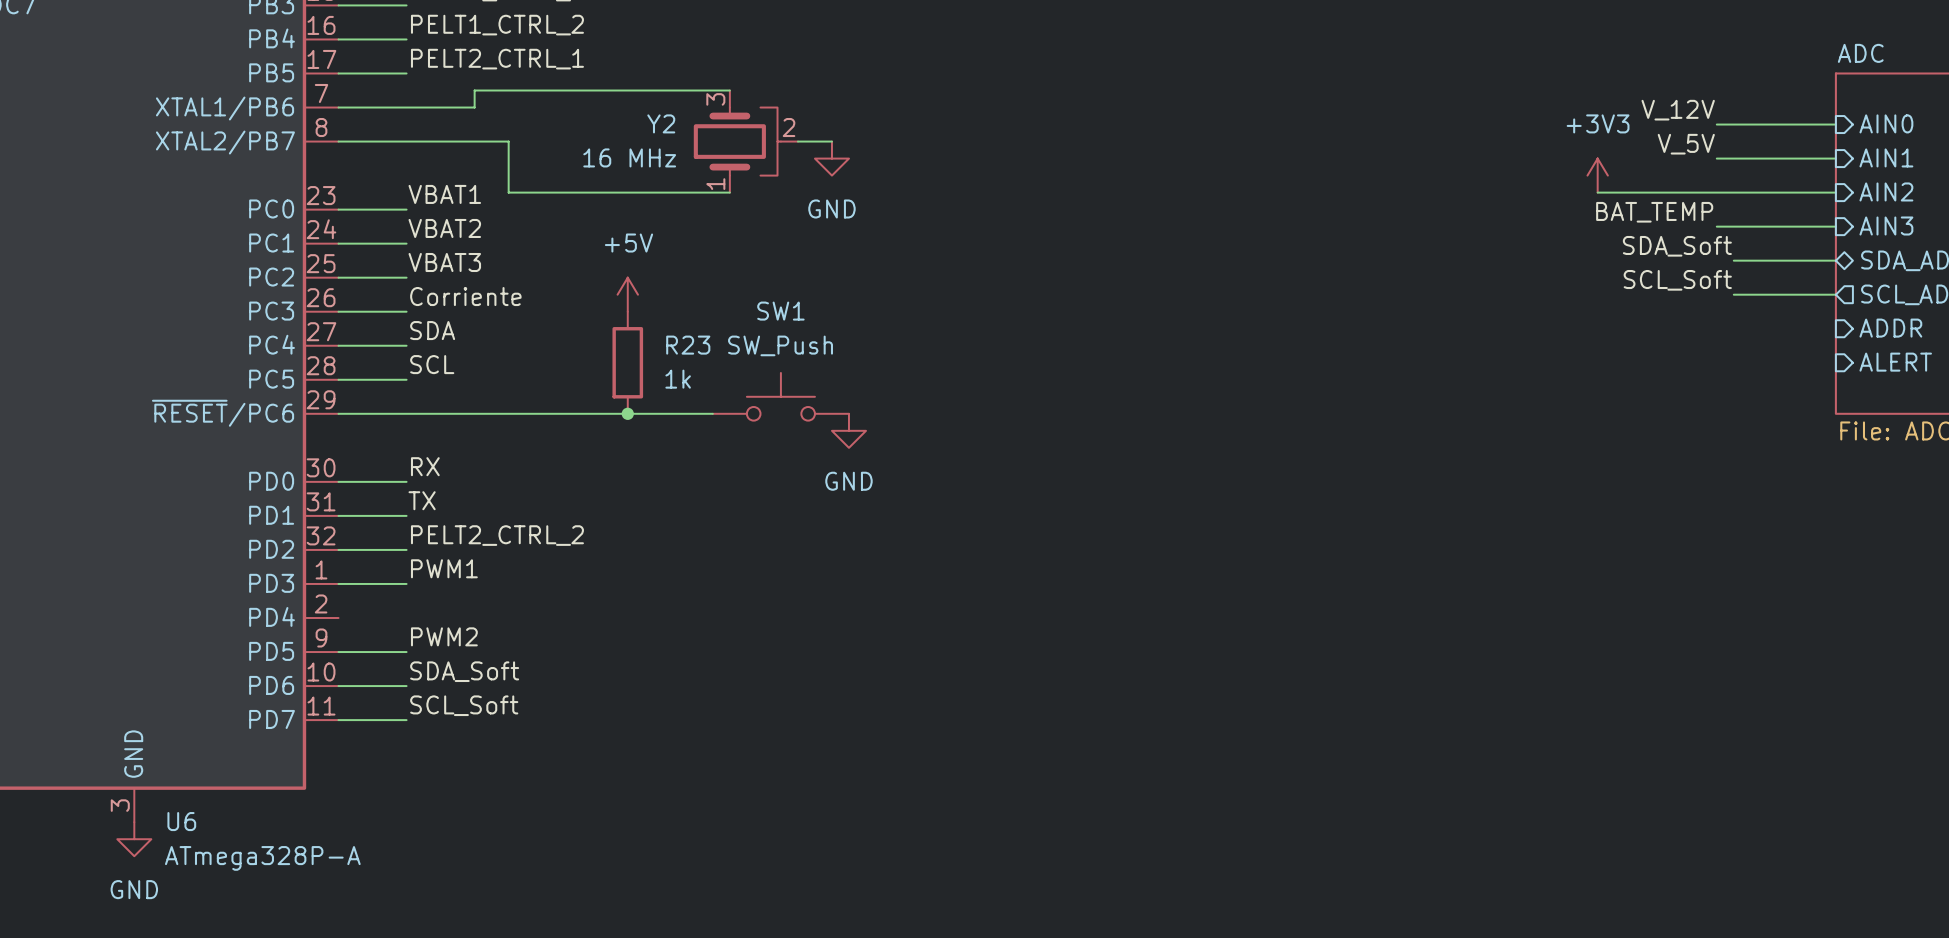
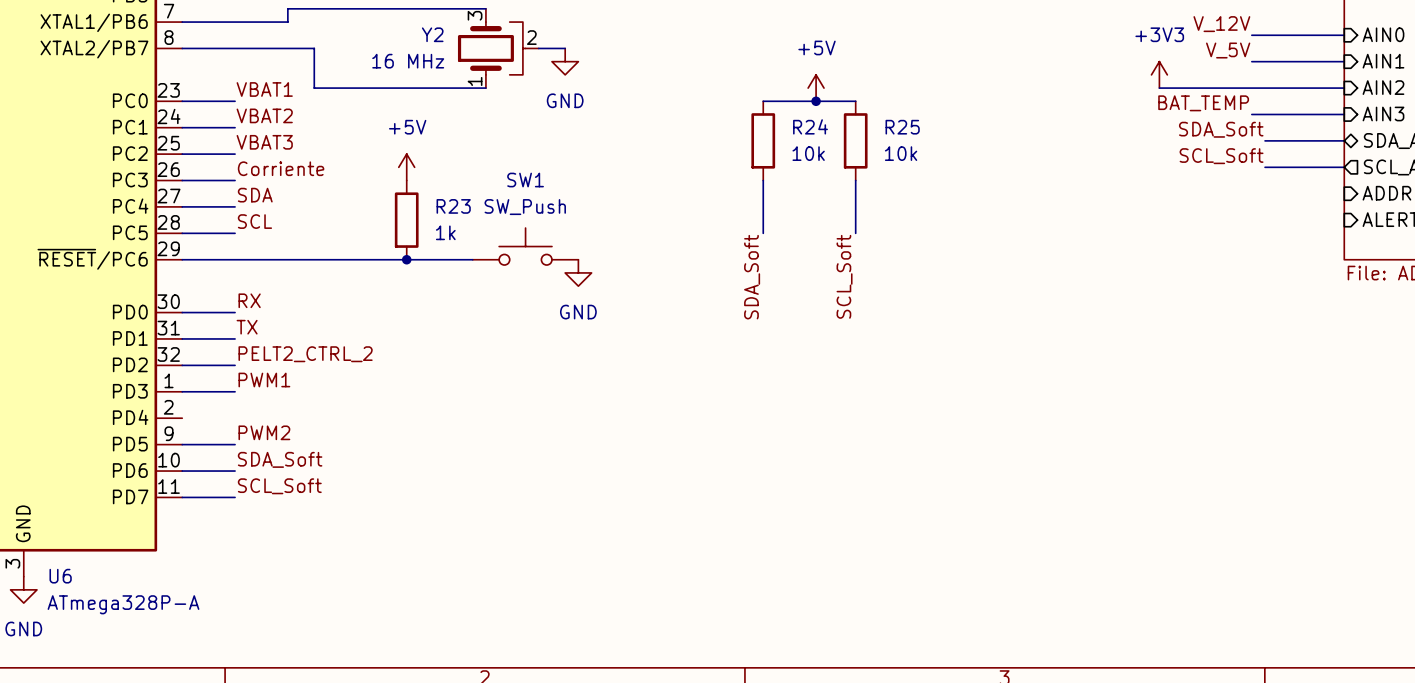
power symbol: none -> +5V (816, 88)
wire: none -> (763, 101) (855, 101)
junction: none -> (816, 101)
R24: none -> 10k (763, 140)
R25: none -> 10k (855, 140)
wire: none -> (763, 180) (763, 233)
wire: none -> (855, 180) (855, 233)
label: none -> SCL_Soft (844, 276)
label: none -> SDA_Soft (752, 277)

